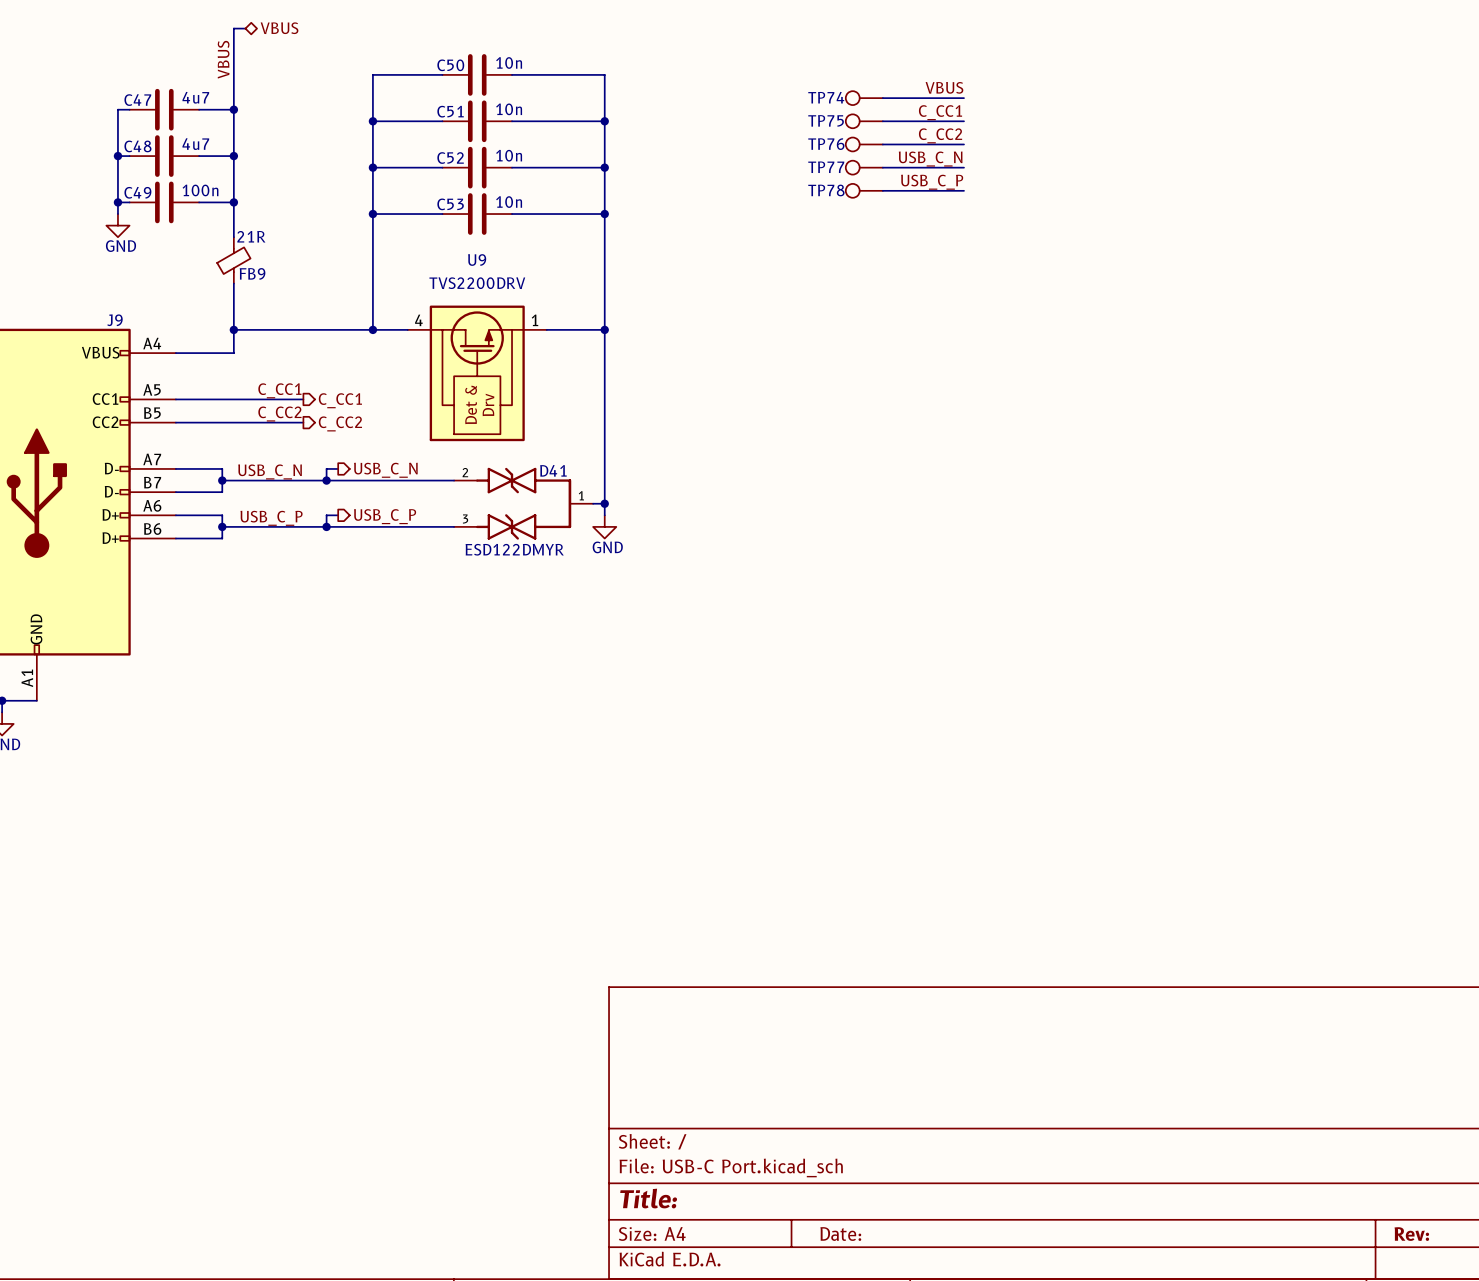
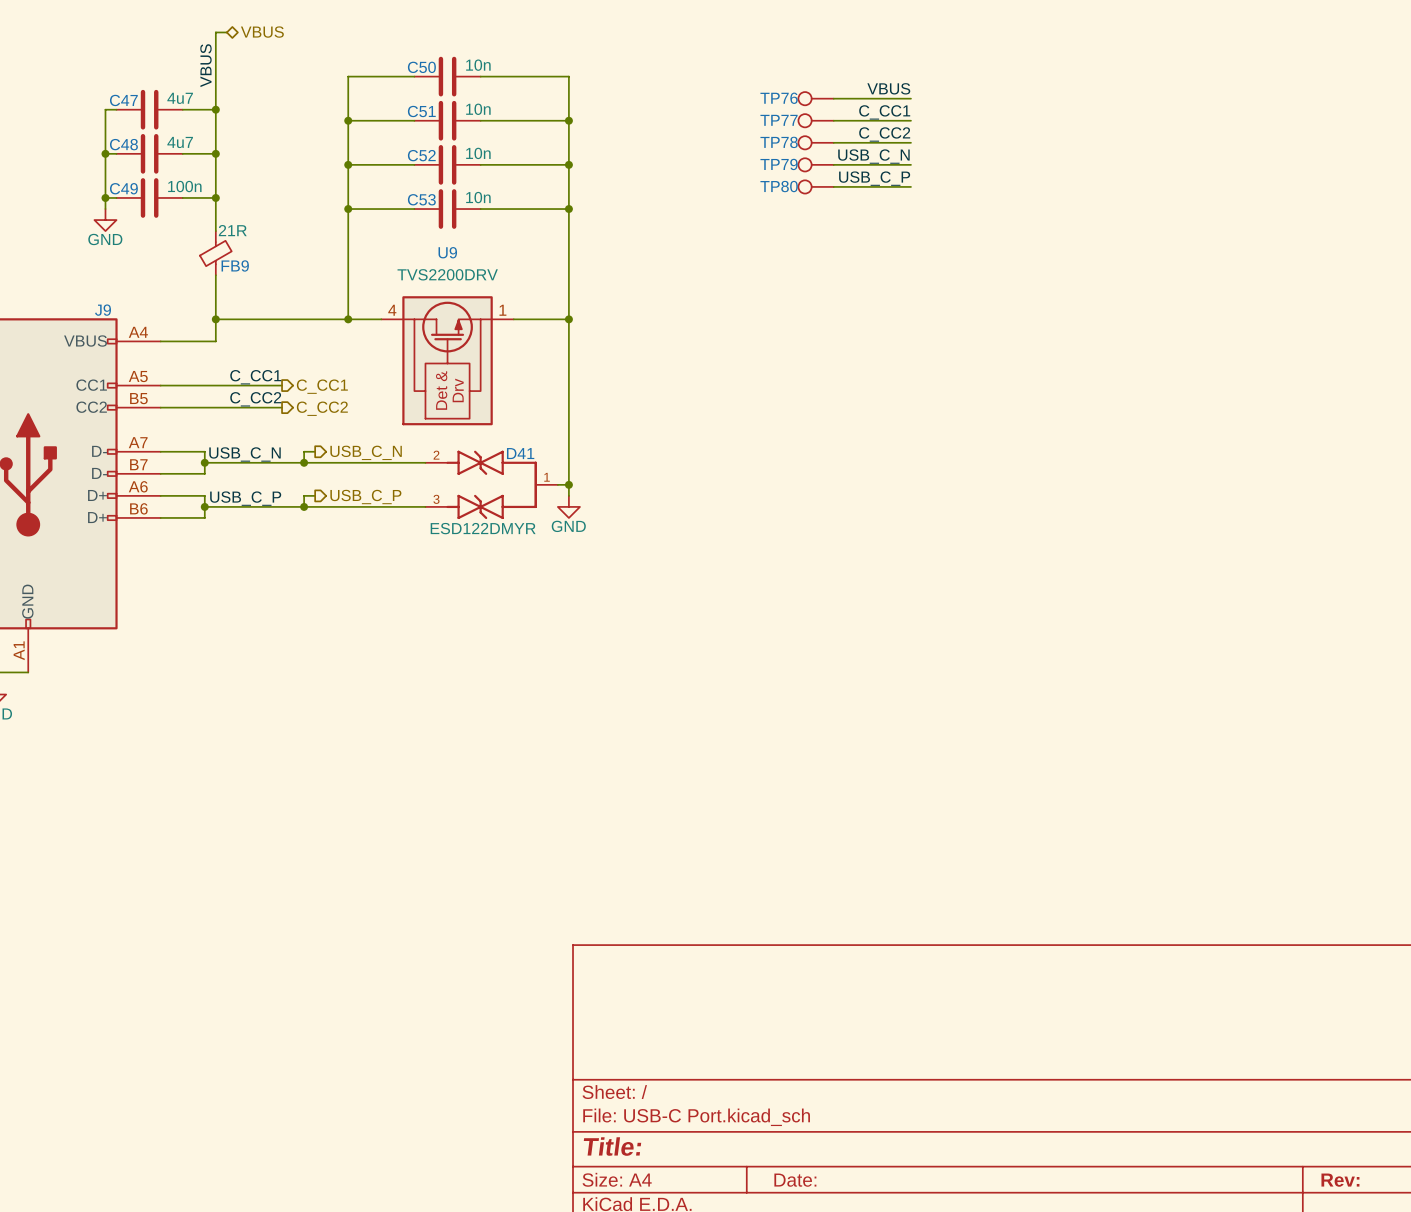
TP74 name: TP74 (826, 97) -> TP76 (779, 98)
TP75 name: TP75 (826, 120) -> TP77 (779, 120)
TP76 name: TP76 (826, 144) -> TP78 (779, 142)
TP77 name: TP77 (826, 167) -> TP79 (779, 164)
TP78 name: TP78 (826, 190) -> TP80 (779, 186)

